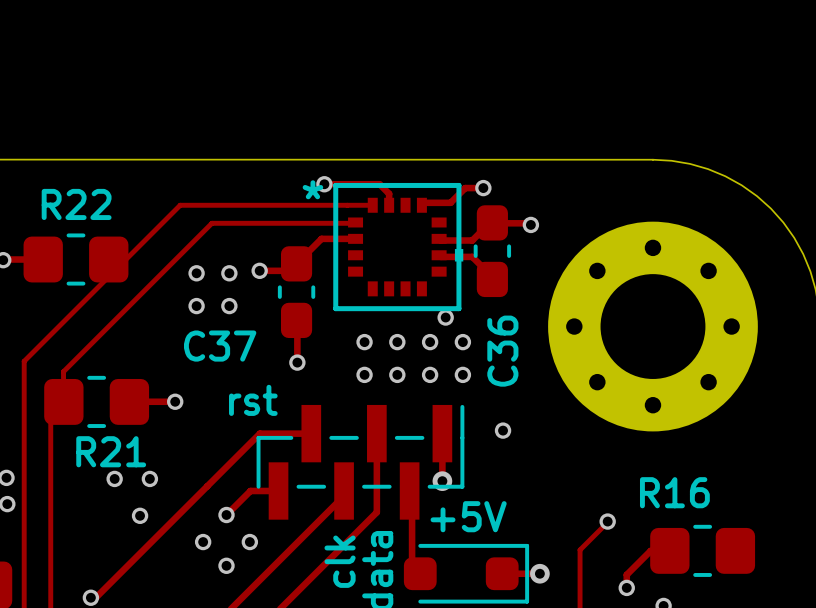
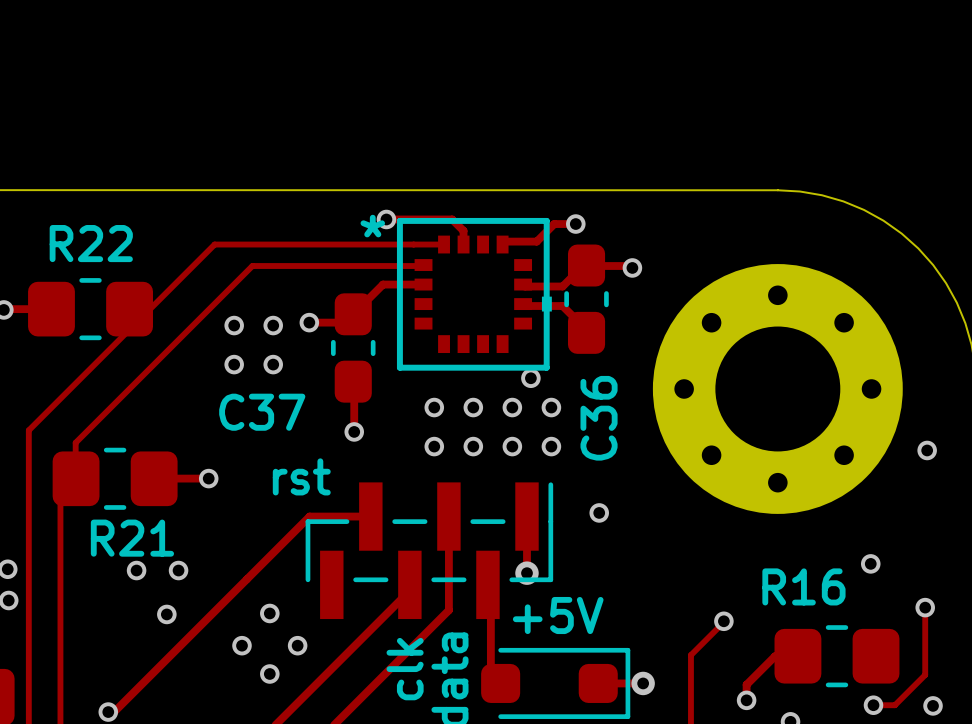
via: none -> (927, 450)
via: none -> (870, 563)
track: (278, 490) (250, 490) (226, 514) -> none
via: none -> (925, 607)
track: none -> (925, 614) (925, 674) (894, 705) (873, 705)
via: none -> (873, 705)
via: none -> (933, 705)

